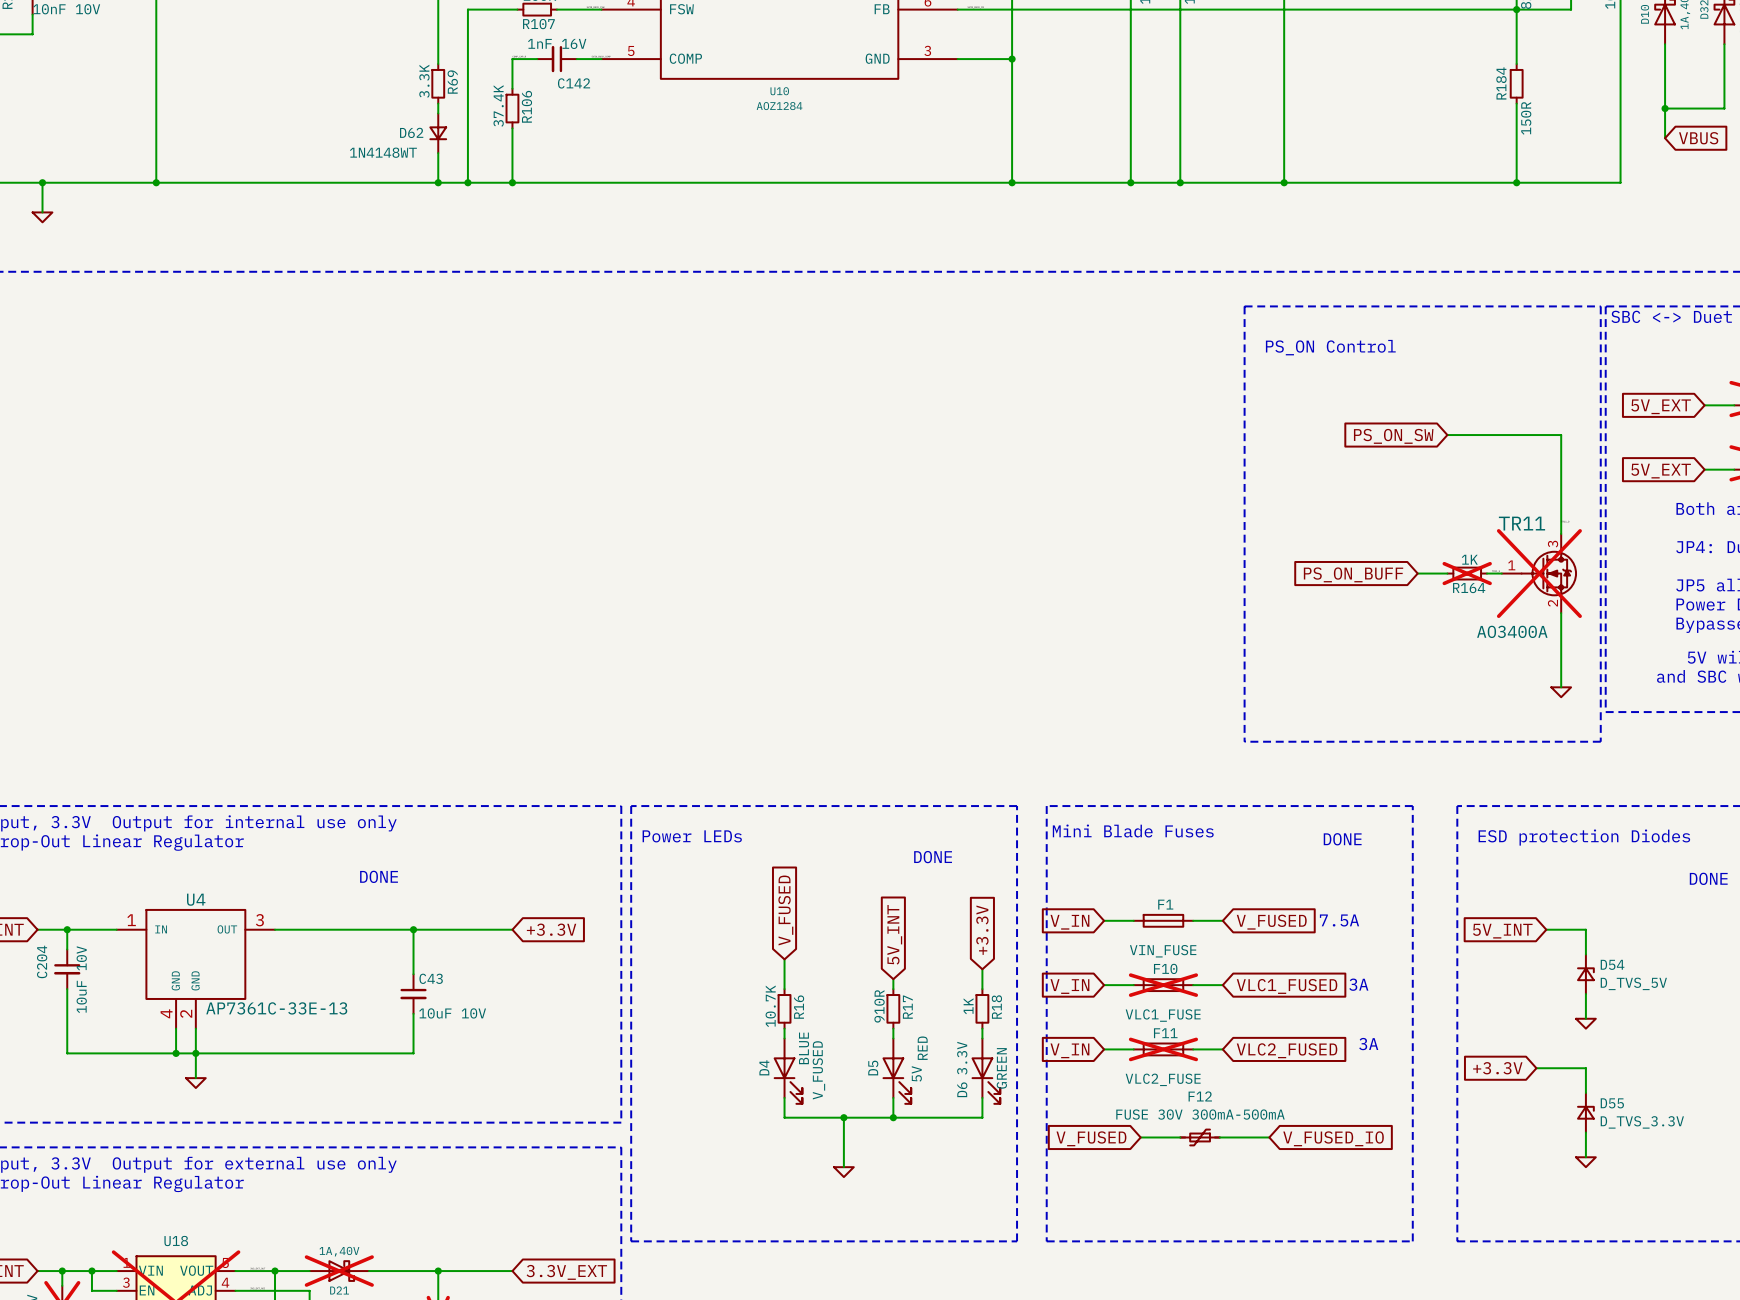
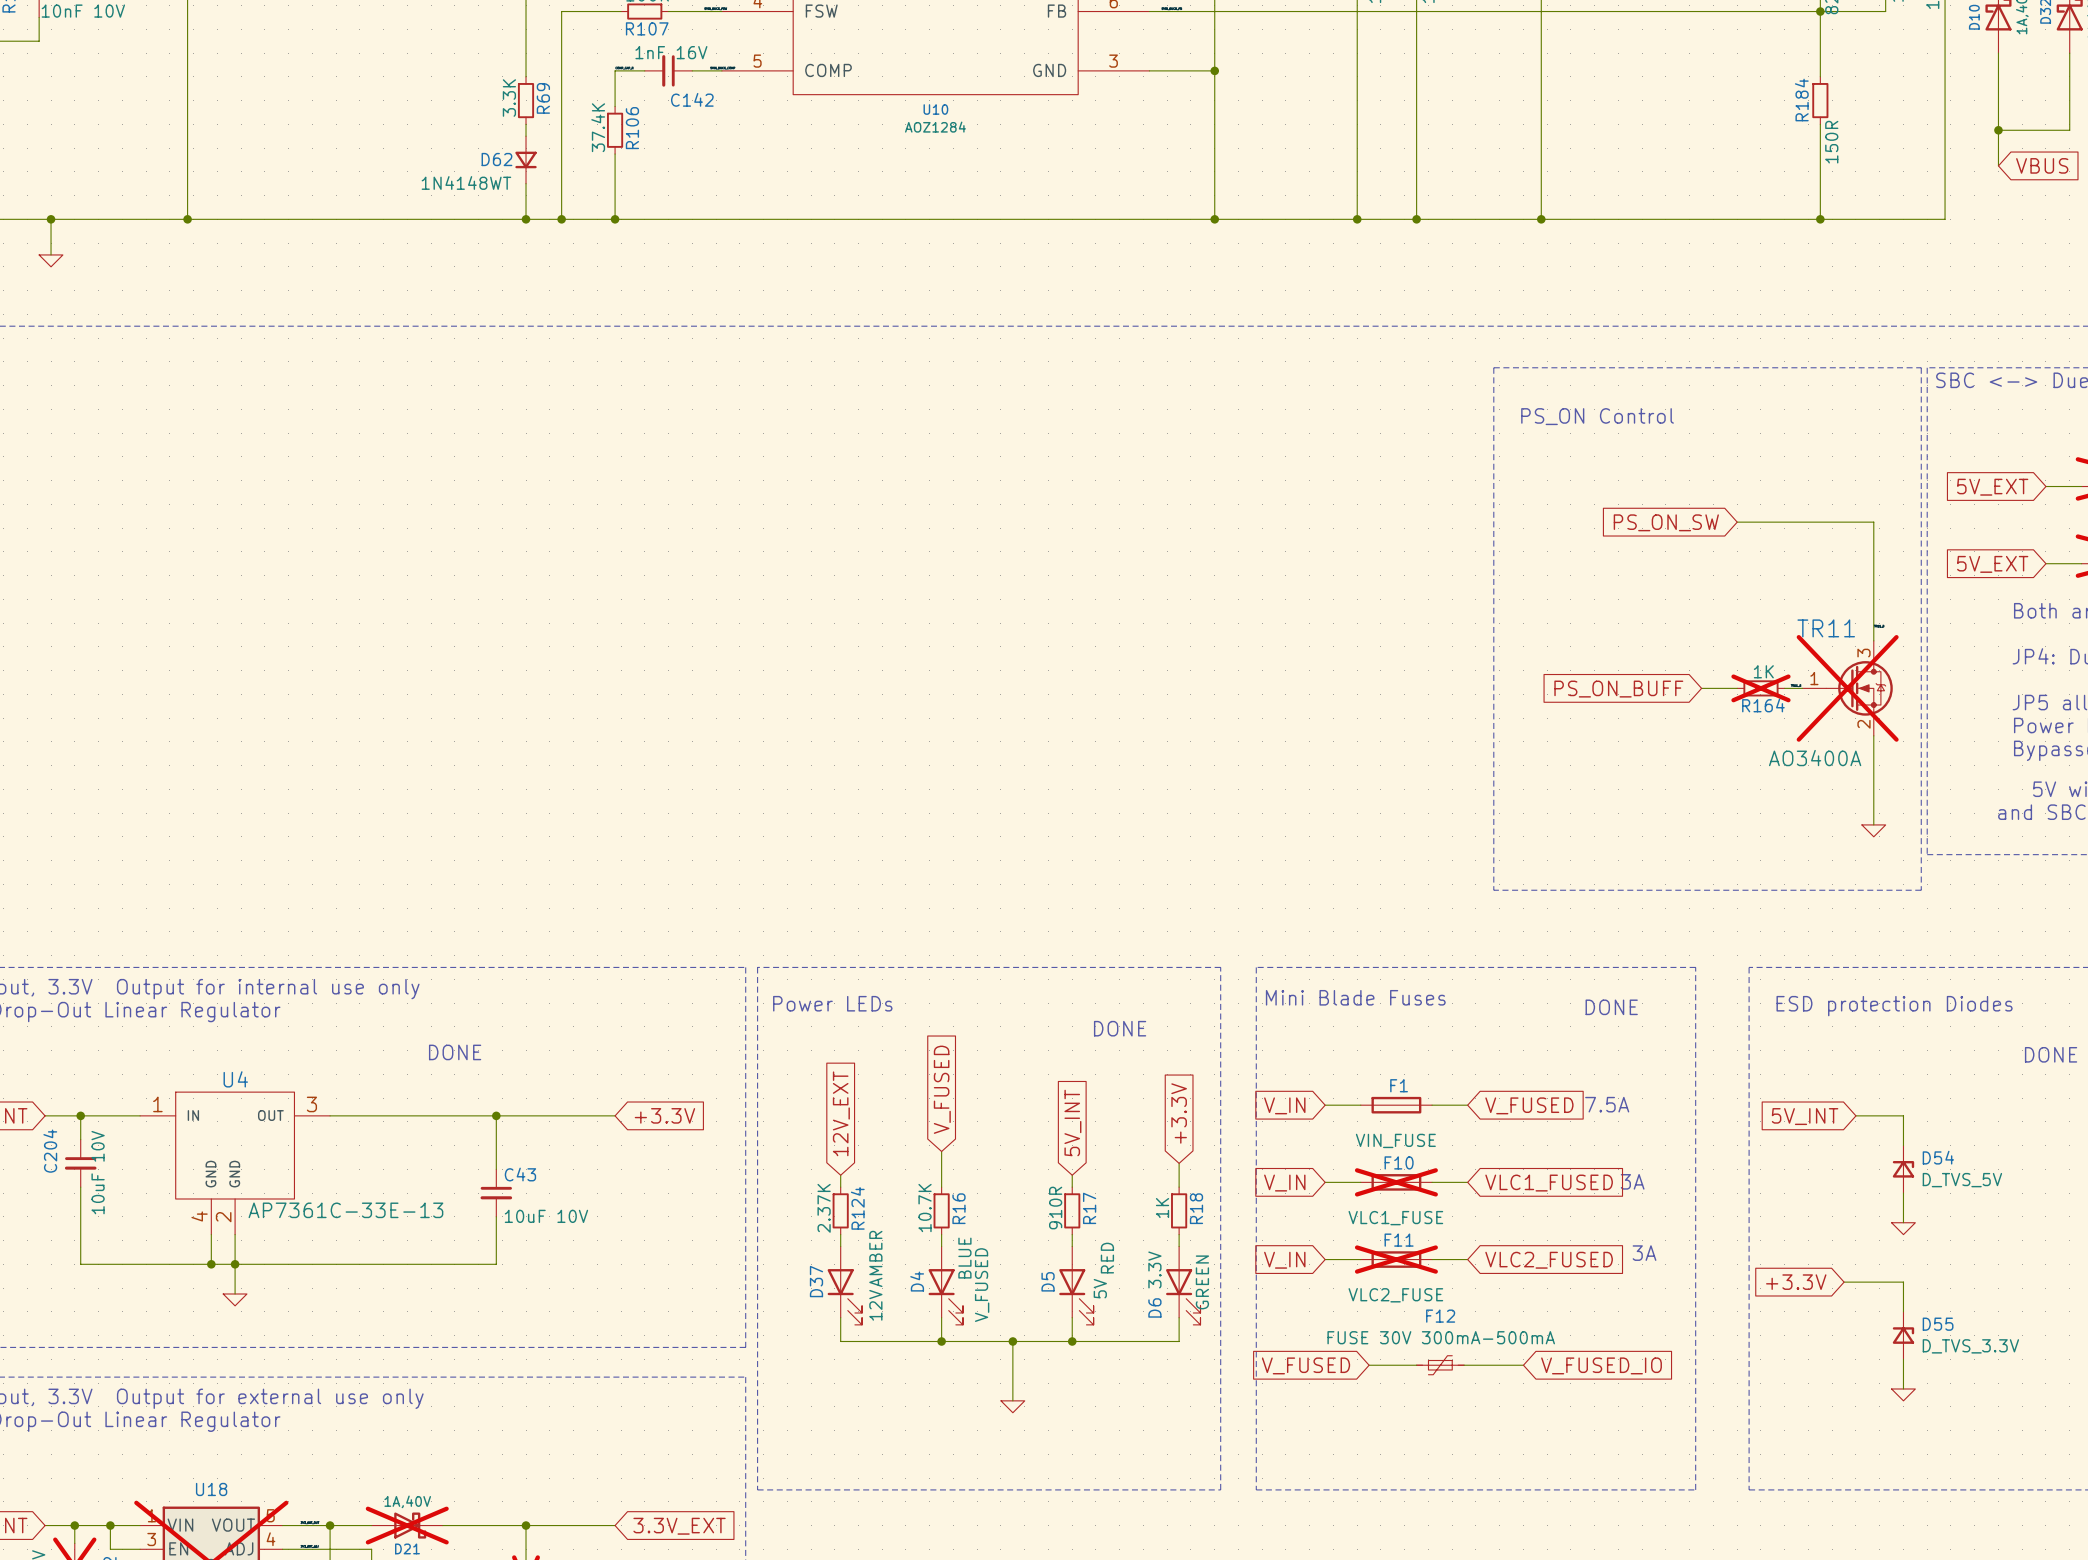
global label: none -> 12V_EXT (841, 1113)
wire: none -> (840, 1175) (840, 1187)
R124: none -> 2.37K (840, 1210)
wire: none -> (840, 1234) (840, 1246)
D37: none -> AMBER (844, 1285)
wire: none -> (840, 1317) (840, 1341) (941, 1341)
junction: none -> (941, 1341)

